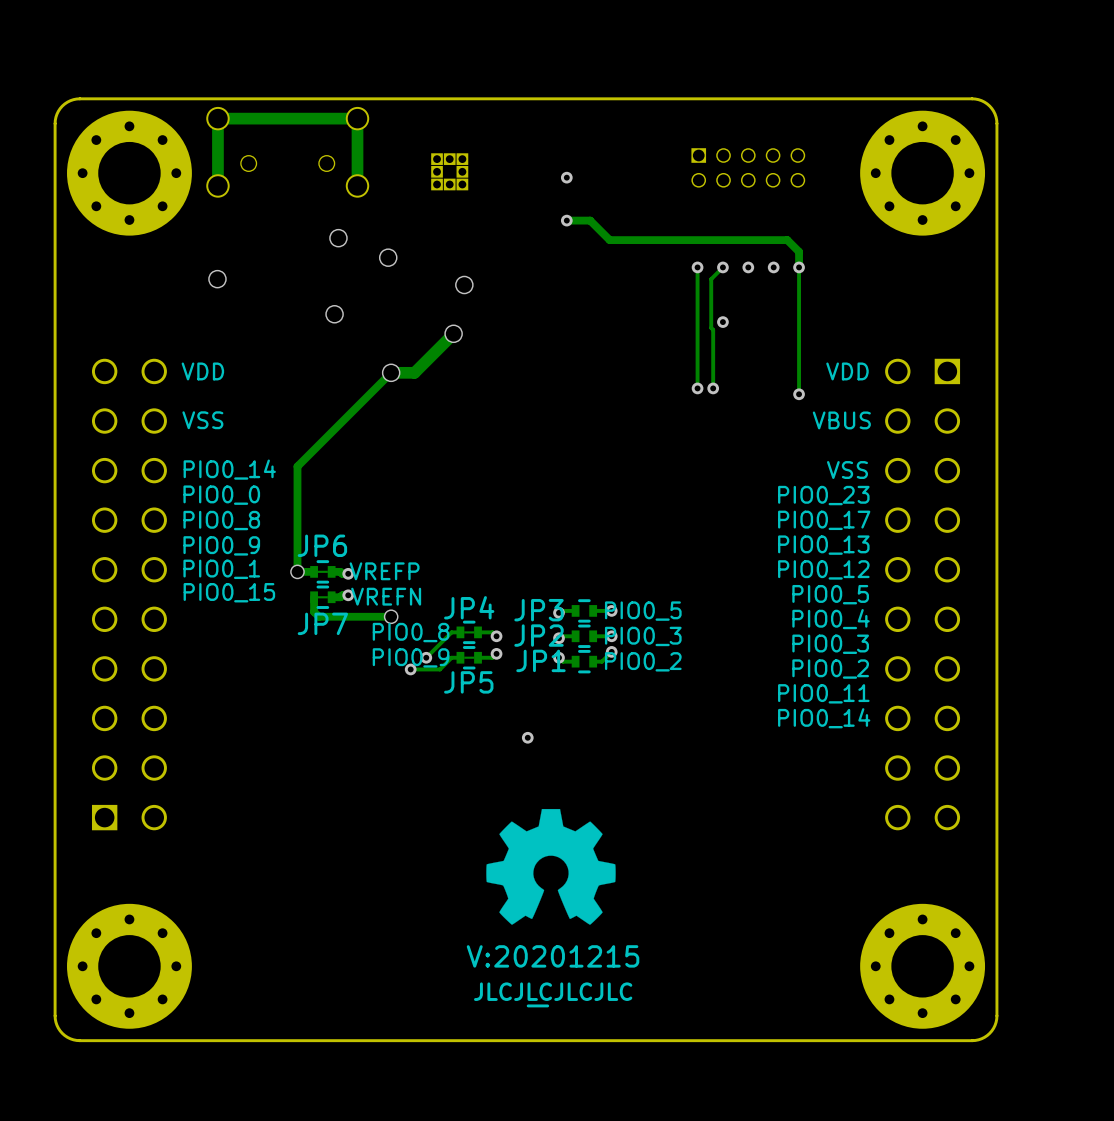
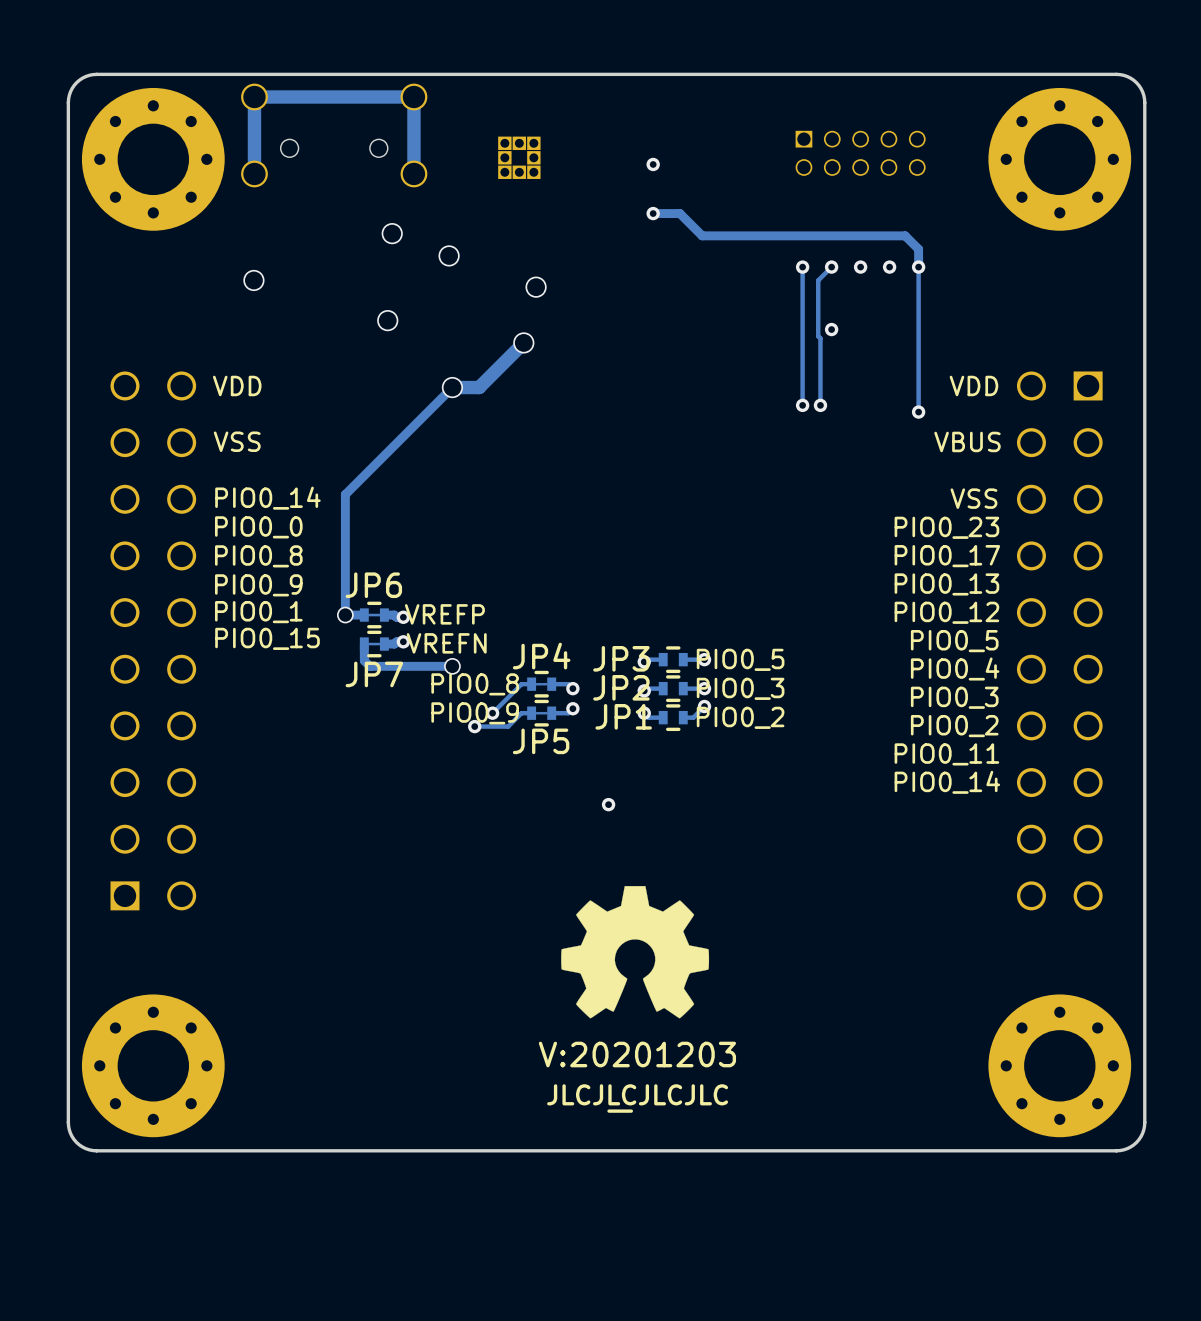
drawing shape: [466, 945, 640, 968] -> [538, 1041, 737, 1068]

